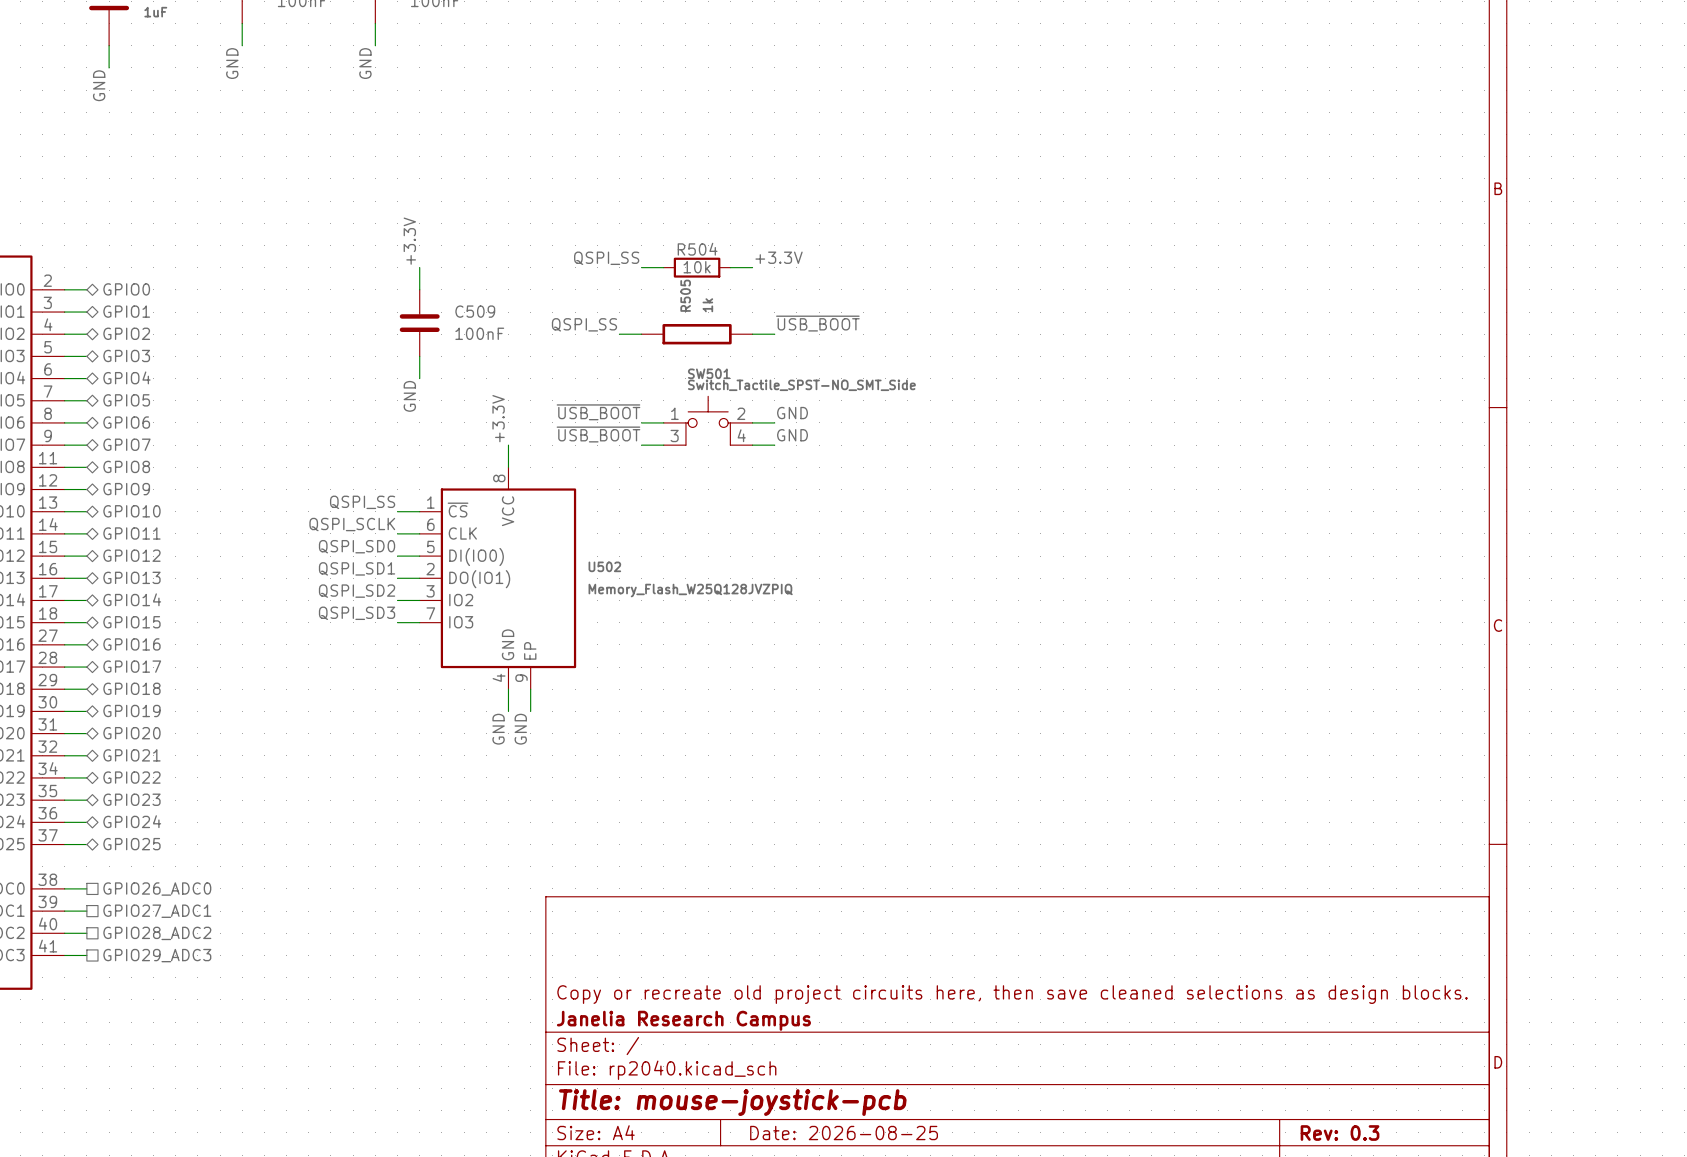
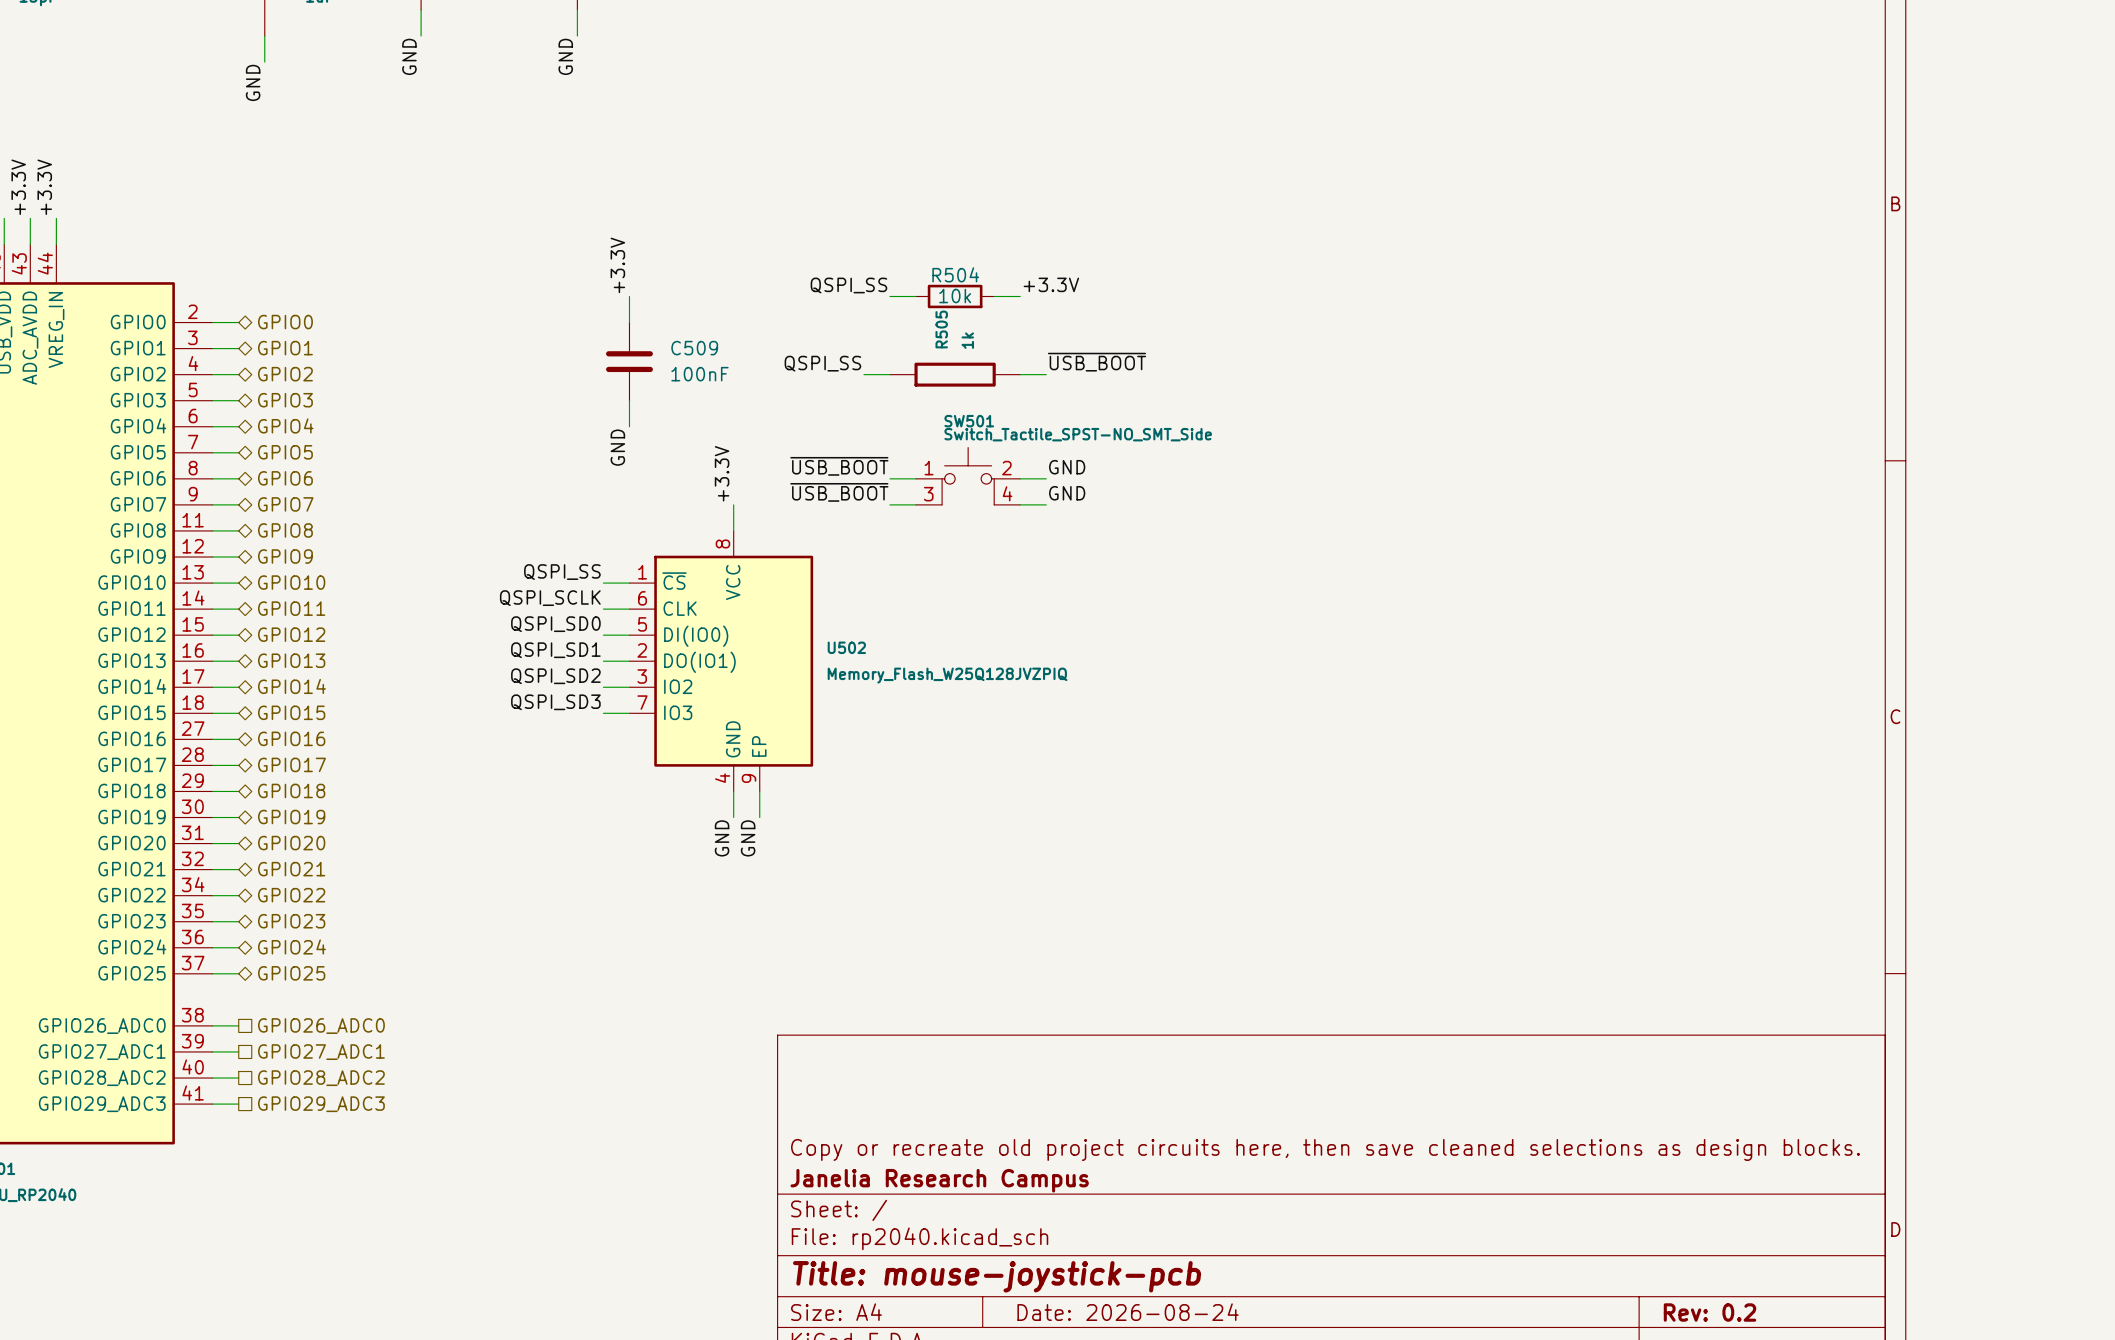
title block: Date: 2026-08-25 (844, 1133) -> Date: 2026-08-24 (1128, 1312)
title block: Rev: 0.3 (1340, 1133) -> Rev: 0.2 (1709, 1312)

